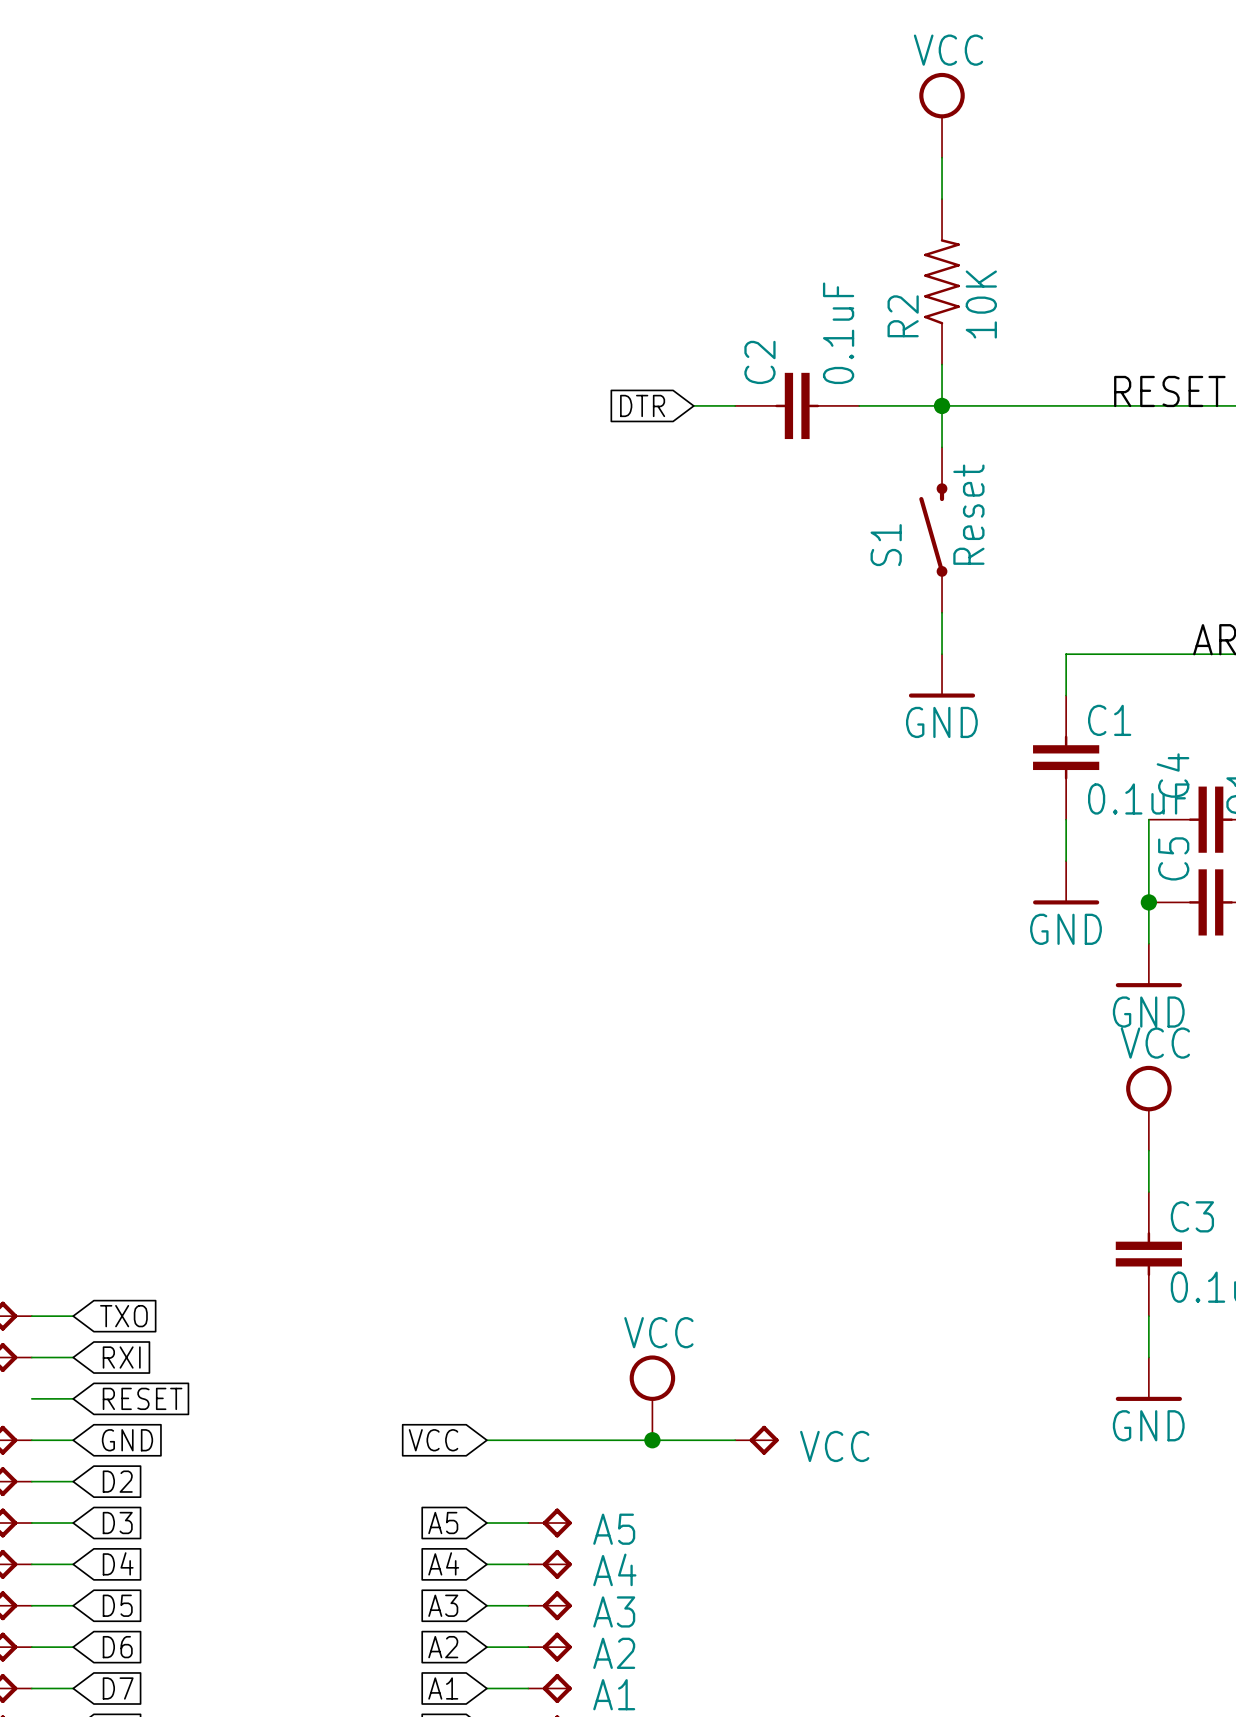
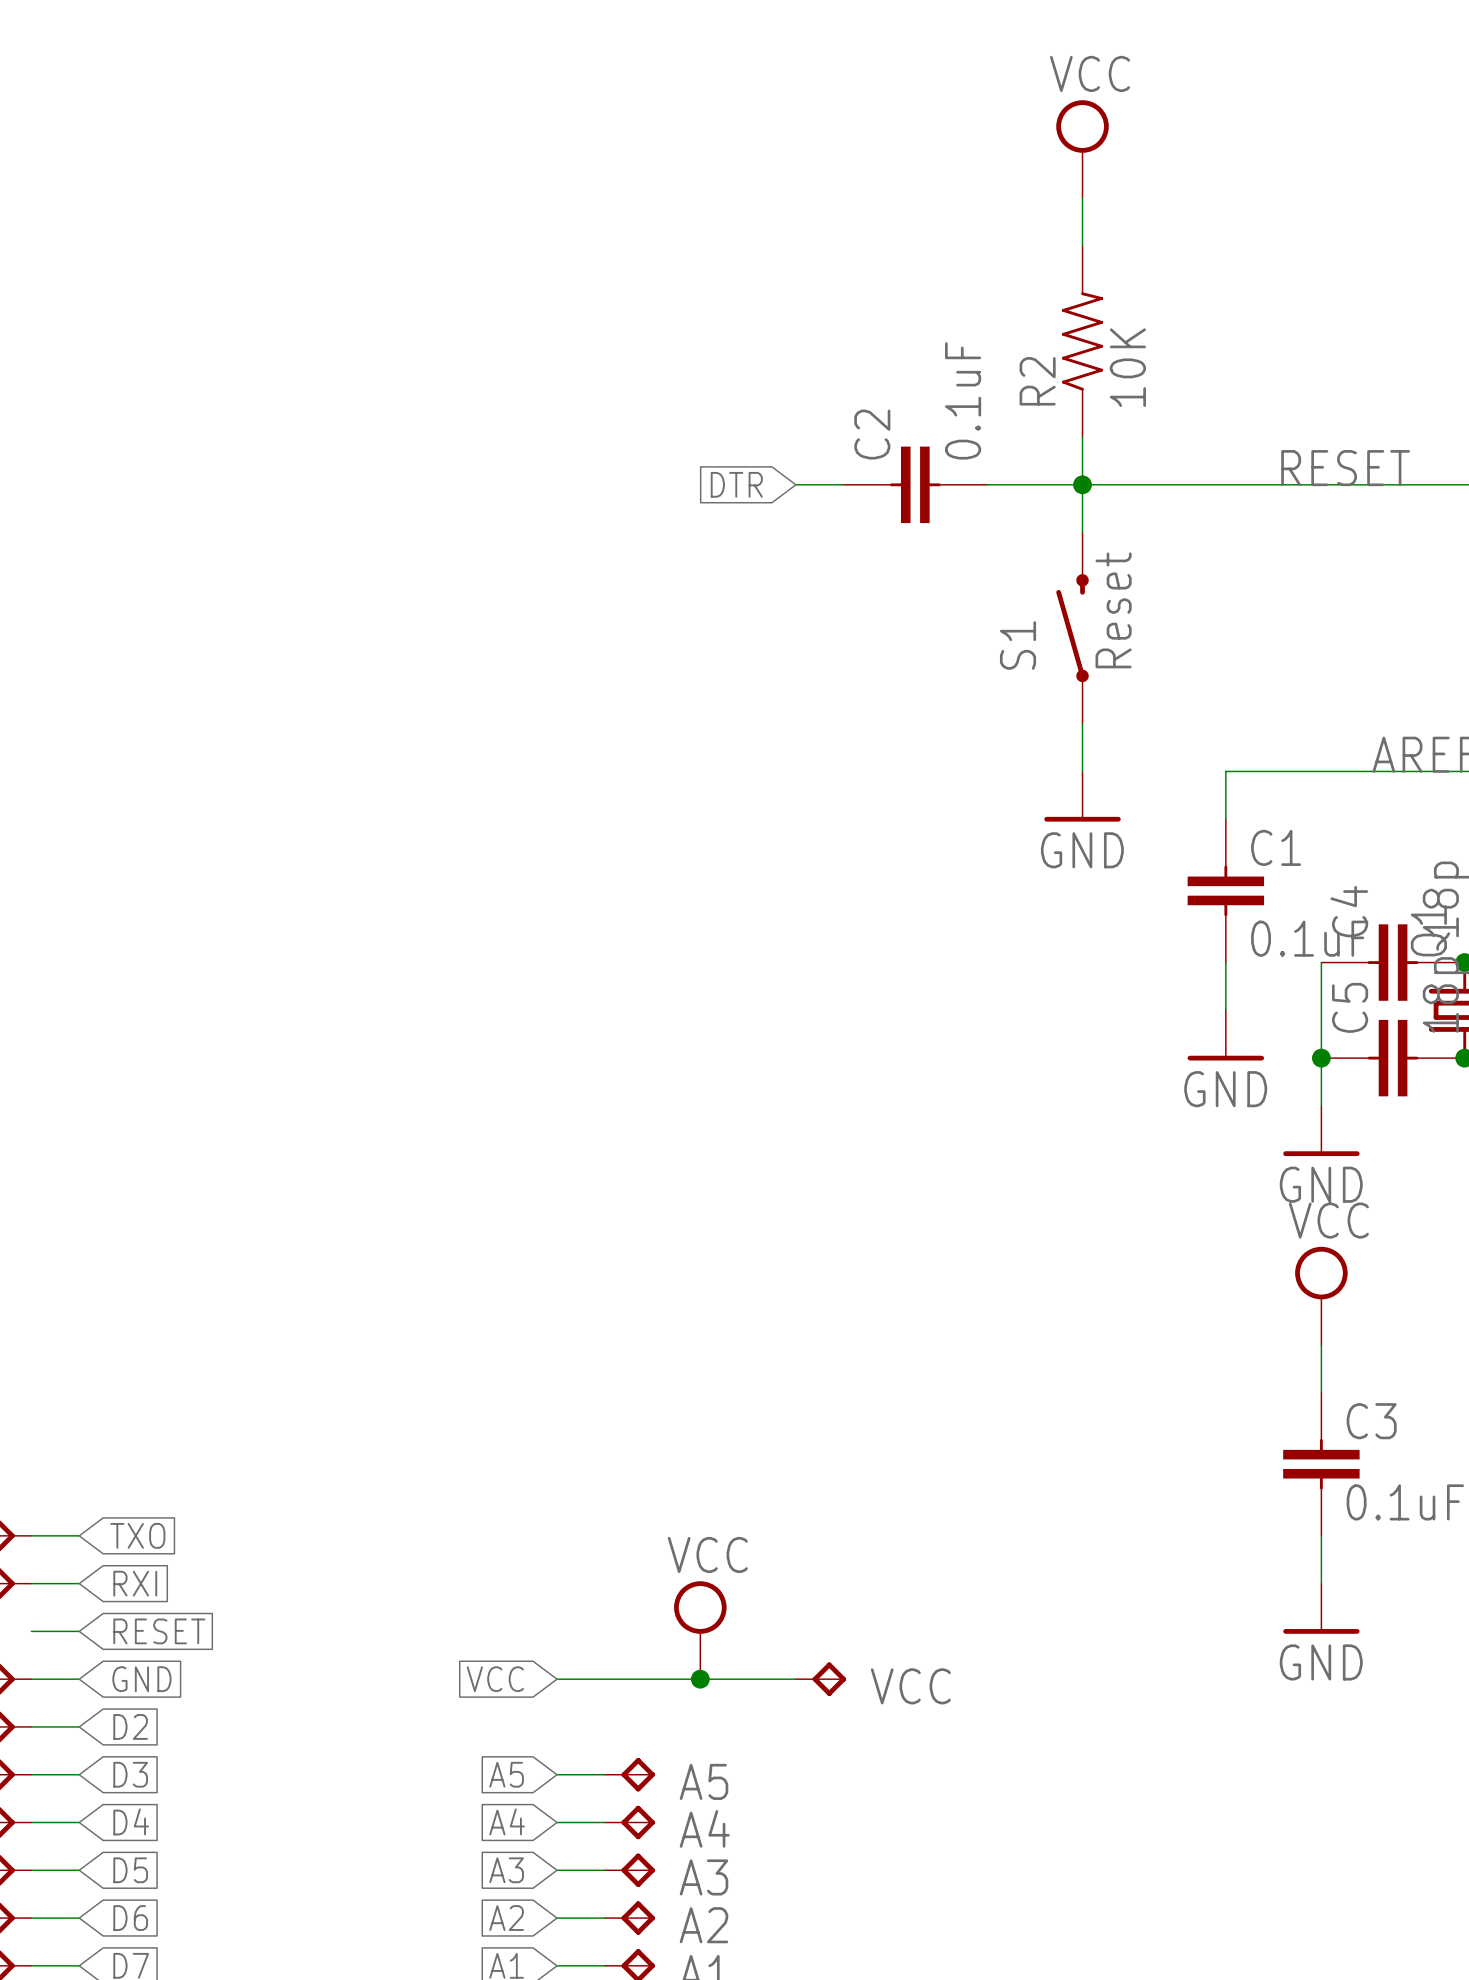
power symbol position: VCC (652, 1397) -> VCC (700, 1630)
junction position: (652, 1440) -> (700, 1679)
VCC position: (756, 1440) -> (820, 1679)

